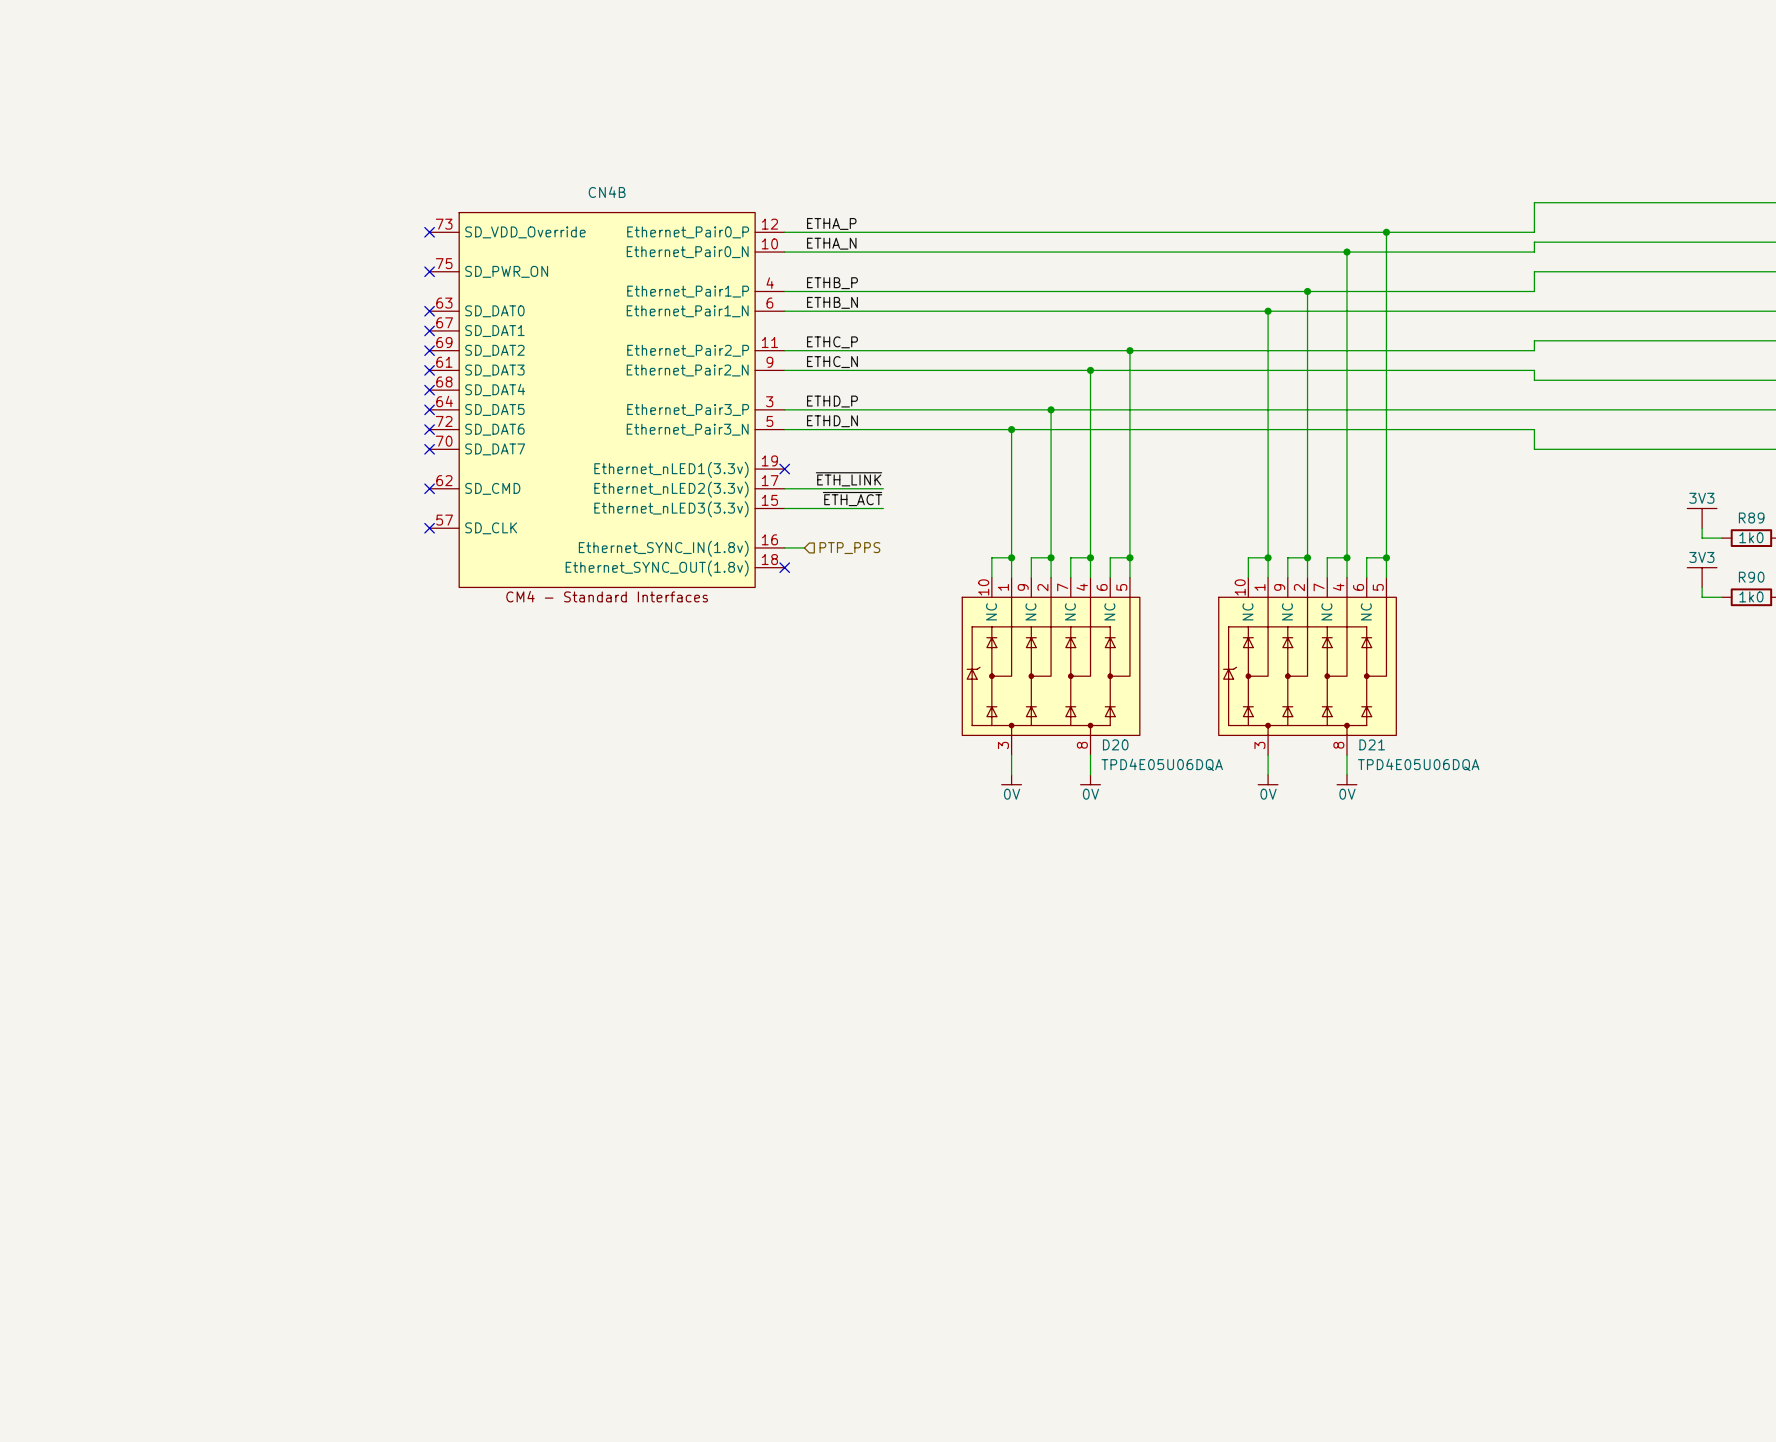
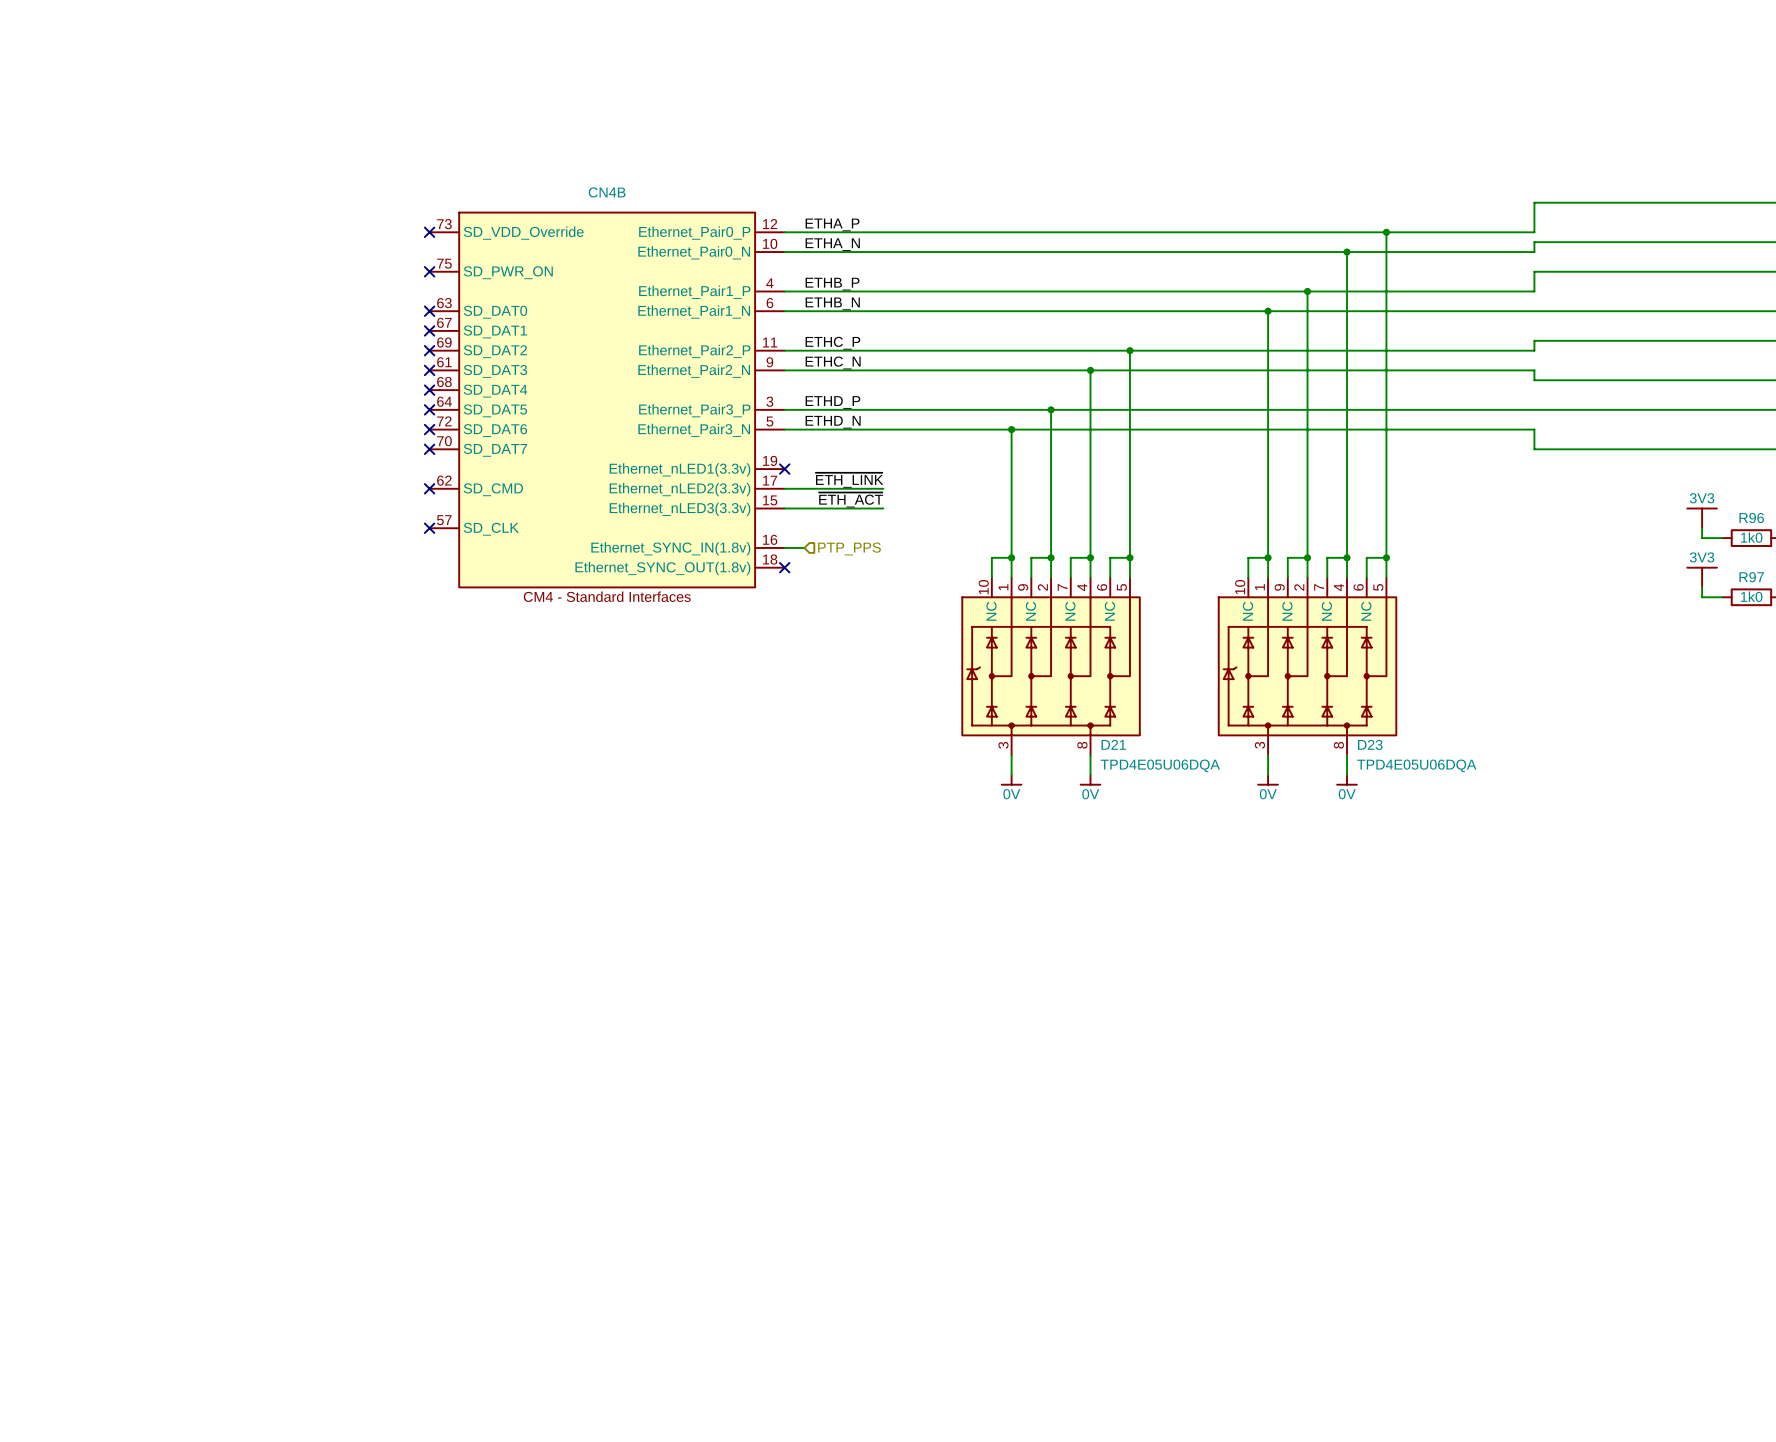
R89 name: R89 (1751, 518) -> R96 (1751, 518)
R90 name: R90 (1751, 577) -> R97 (1751, 577)
D20 name: D20 (1115, 744) -> D21 (1113, 744)
D21 name: D21 (1372, 744) -> D23 (1370, 744)

